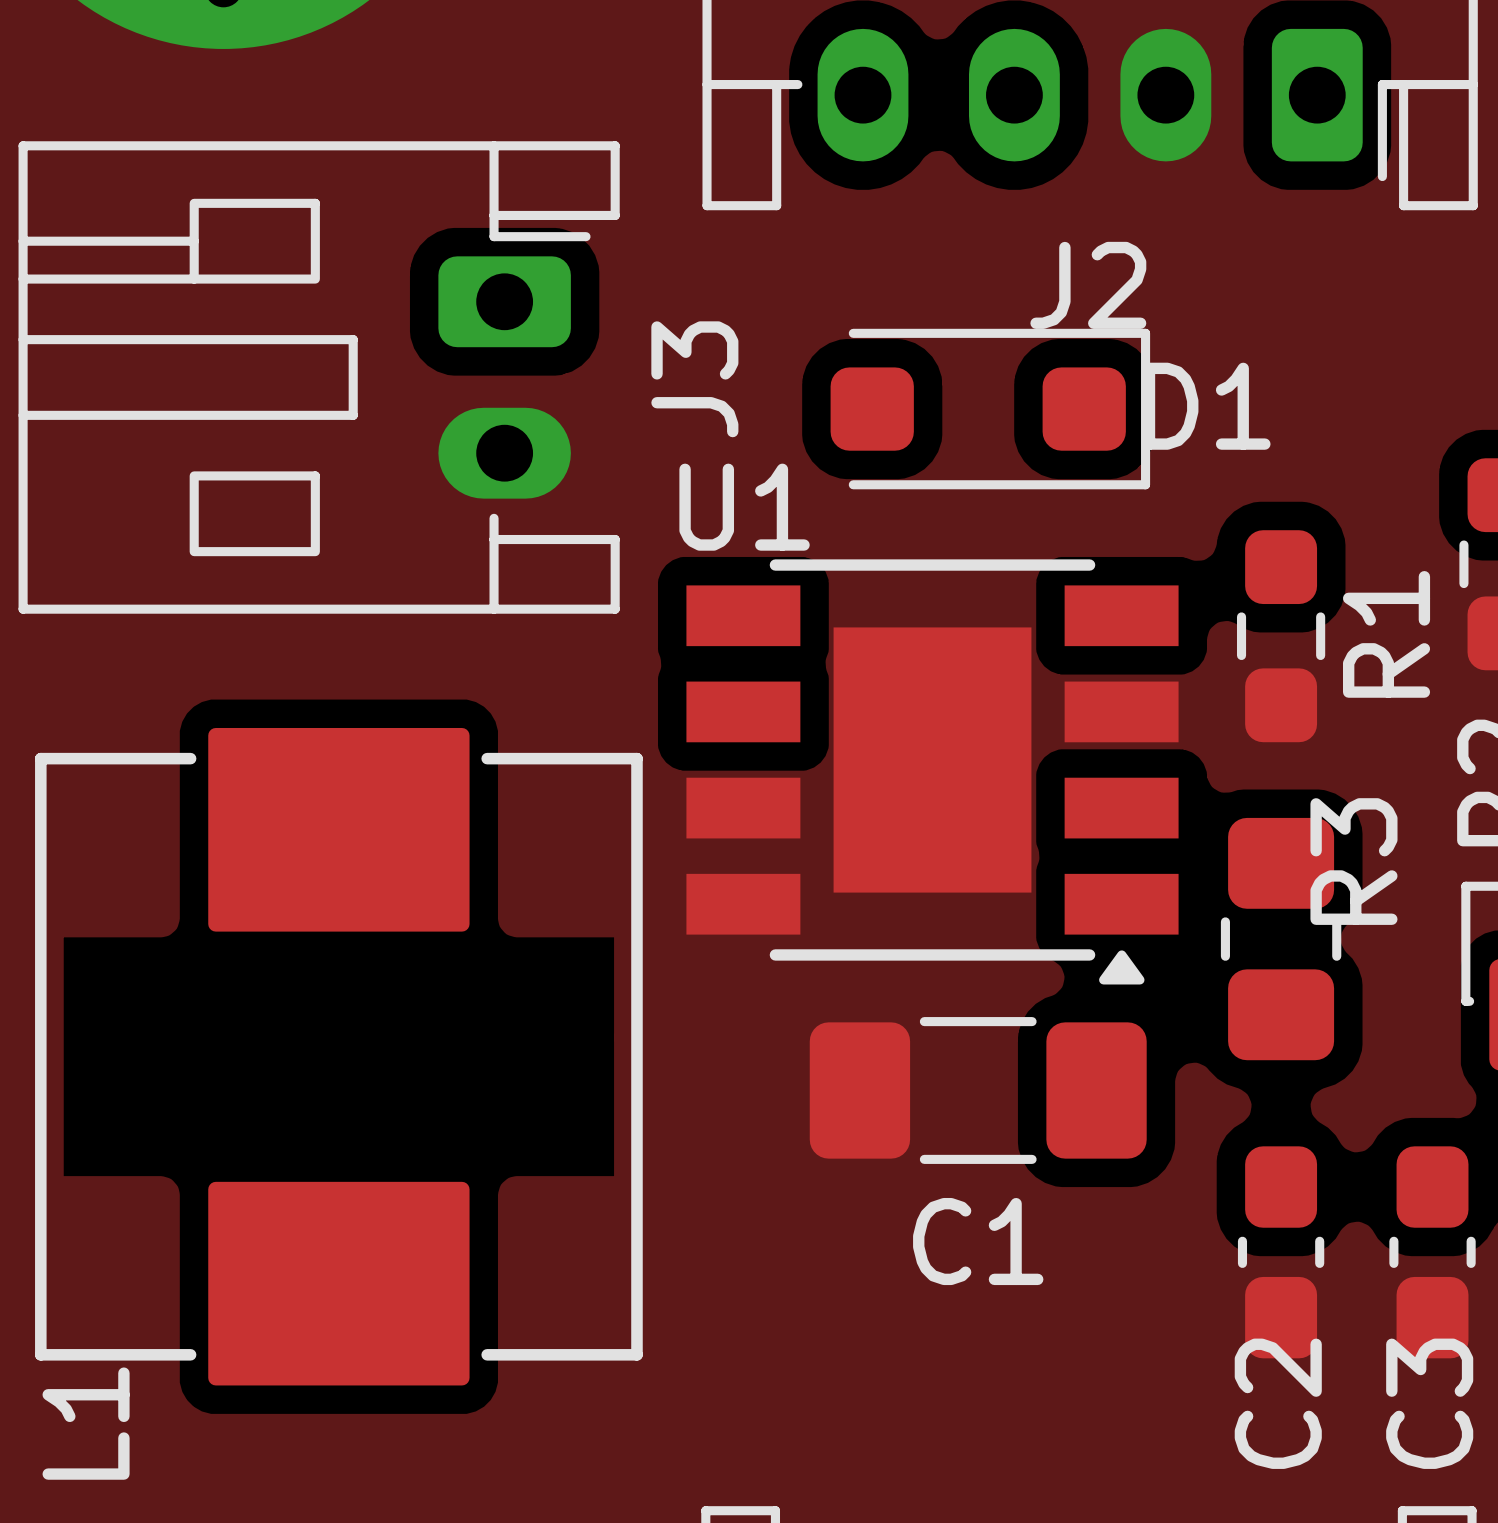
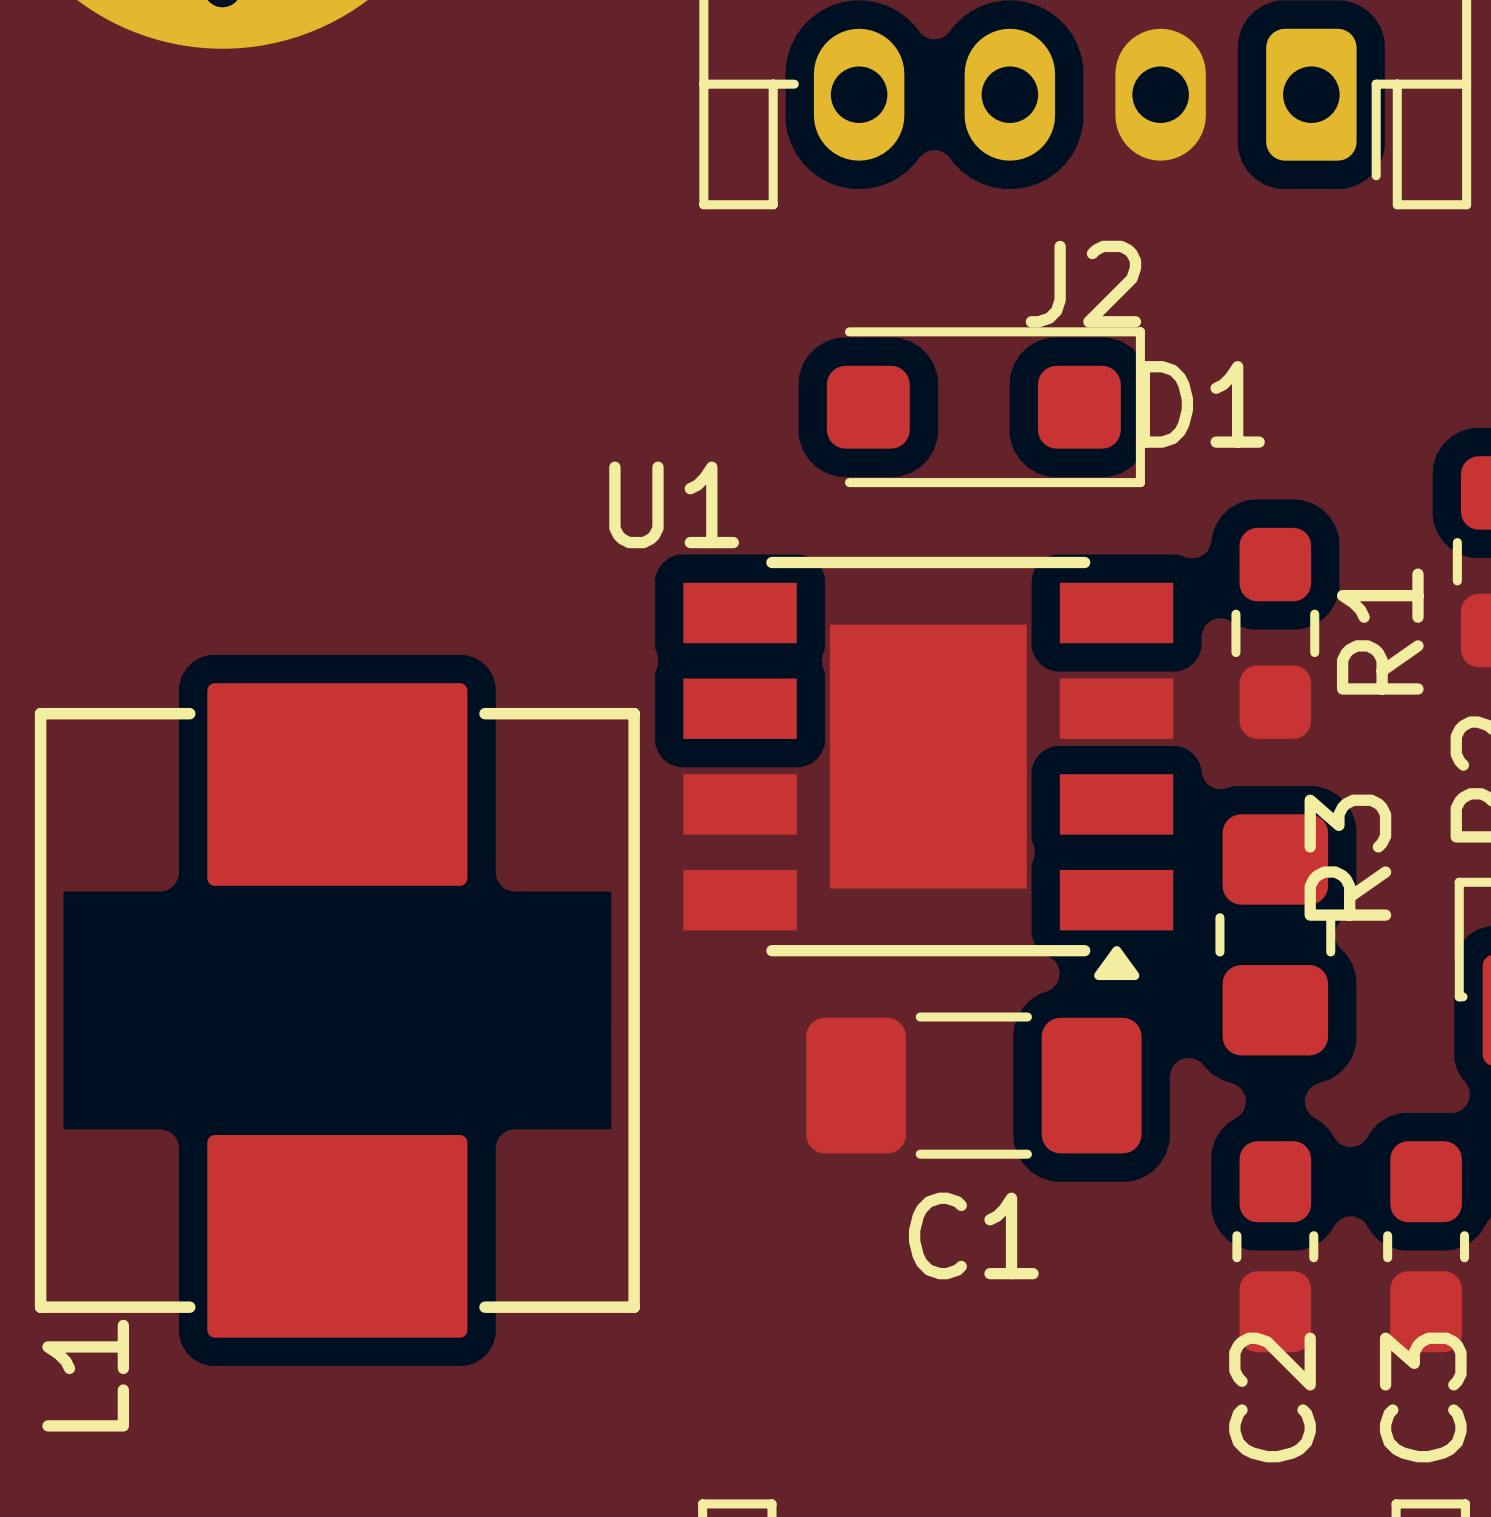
J3: (319, 377) -> none
U1 name position: U1 (744, 507) -> U1 (674, 504)
L1 position: (338, 1056) -> (337, 1010)

